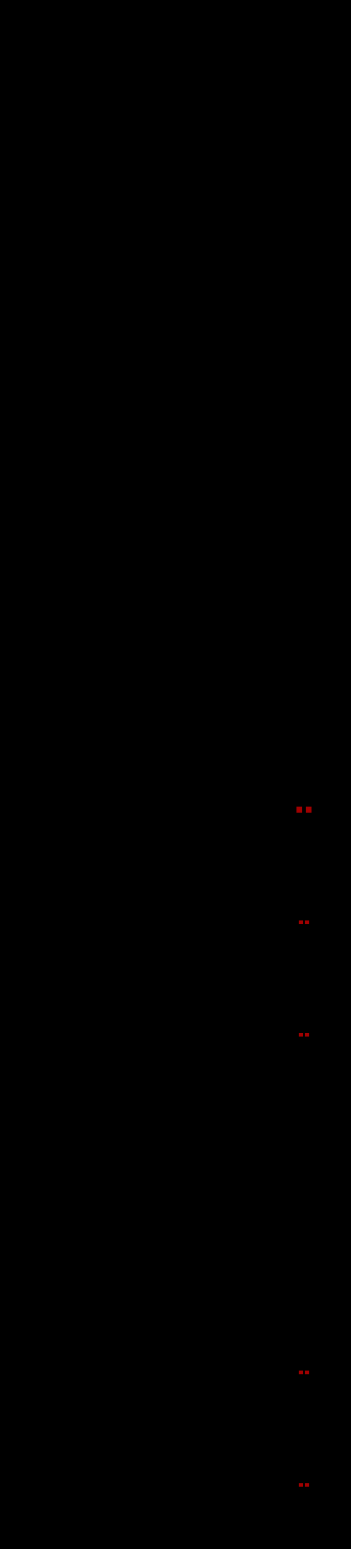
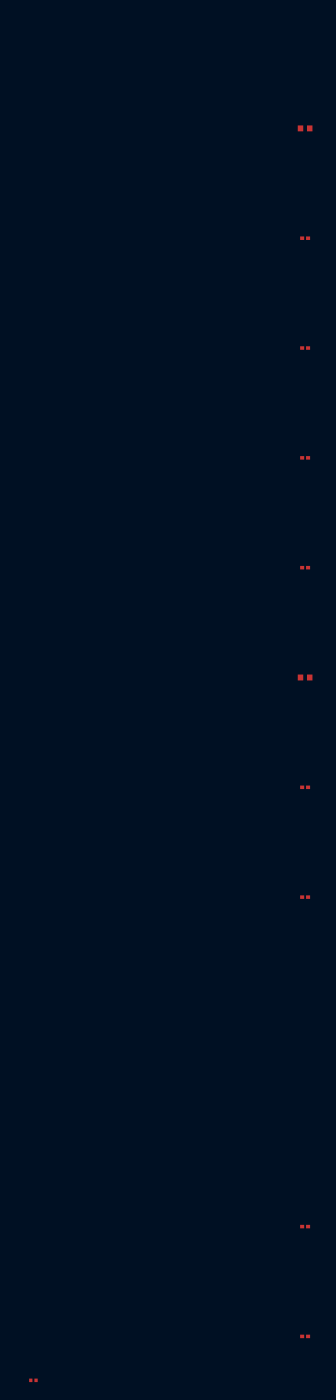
part: none -> (305, 128)
part: none -> (305, 238)
part: none -> (305, 348)
part: none -> (305, 457)
part: none -> (305, 567)
part: none -> (33, 1380)

